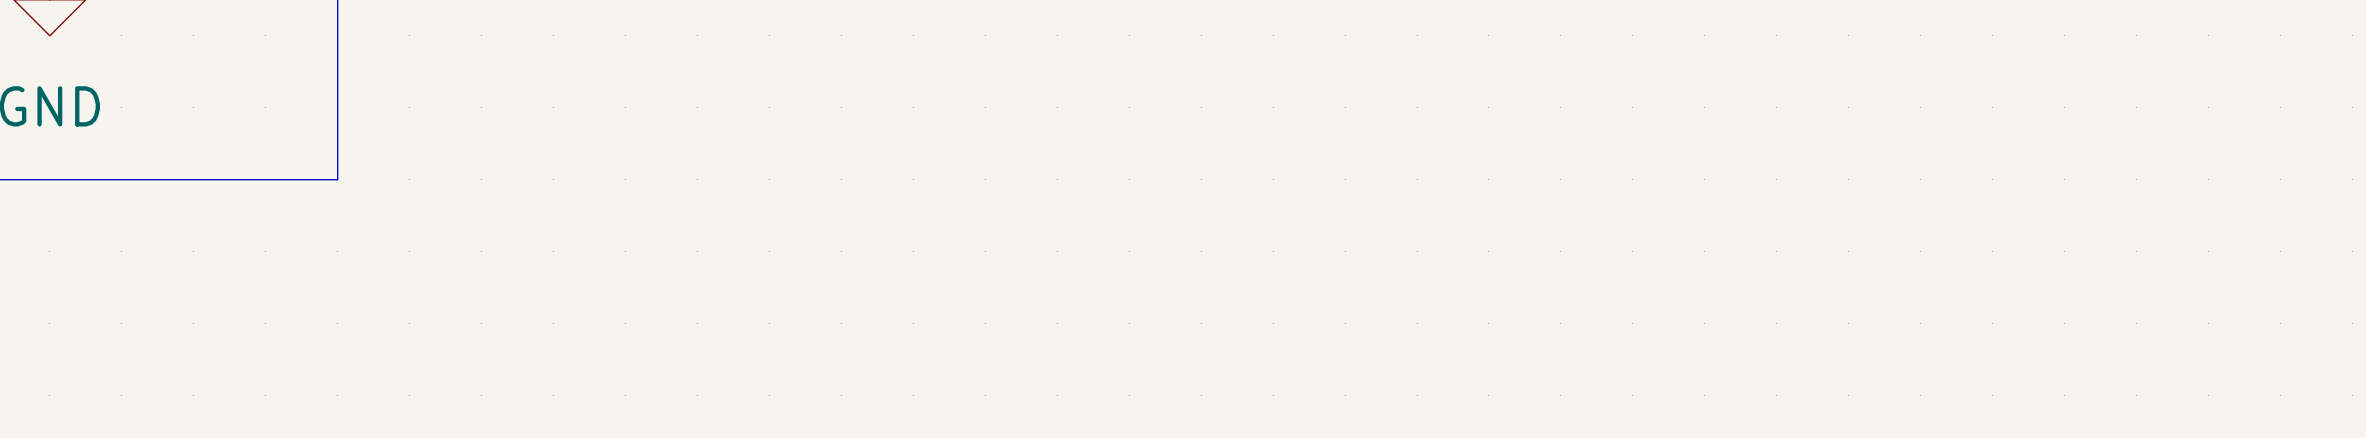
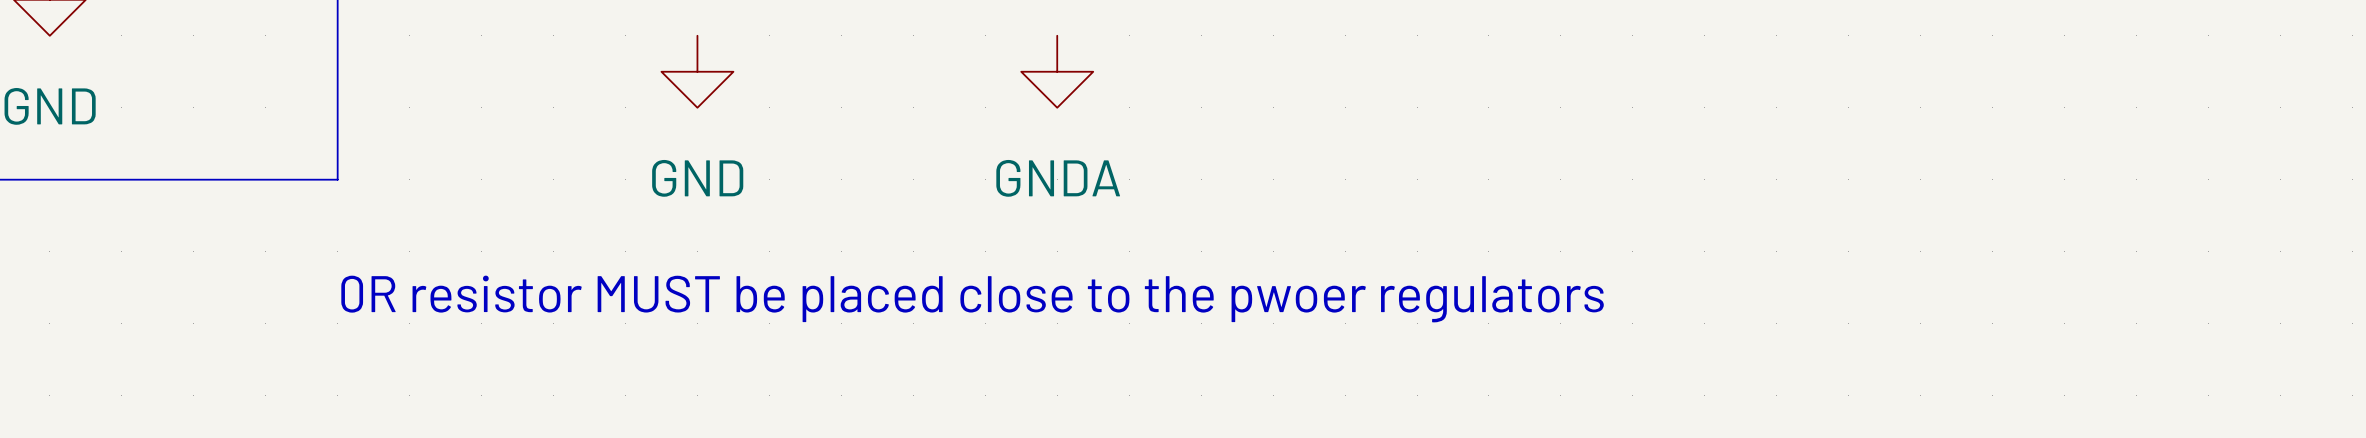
power symbol: none -> GND (697, 71)
power symbol: none -> GNDA (1057, 71)
text: none -> 0R resistor MUST be placed close to the pwoer regulators (972, 298)

